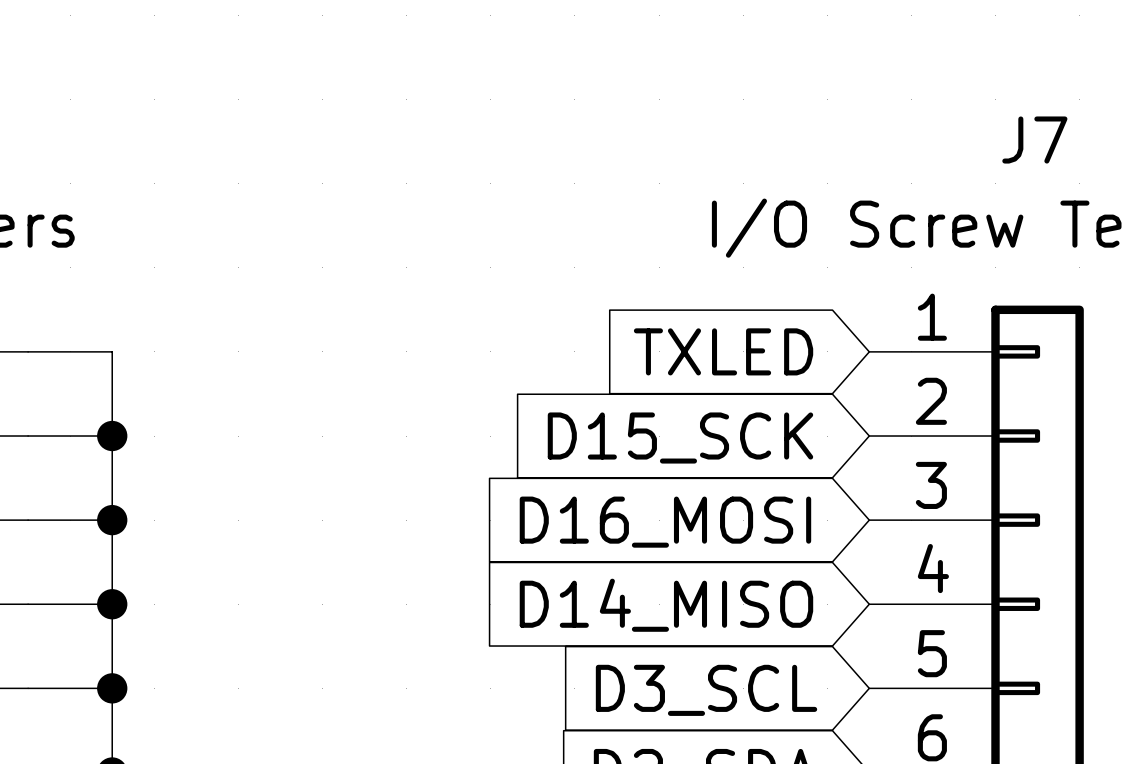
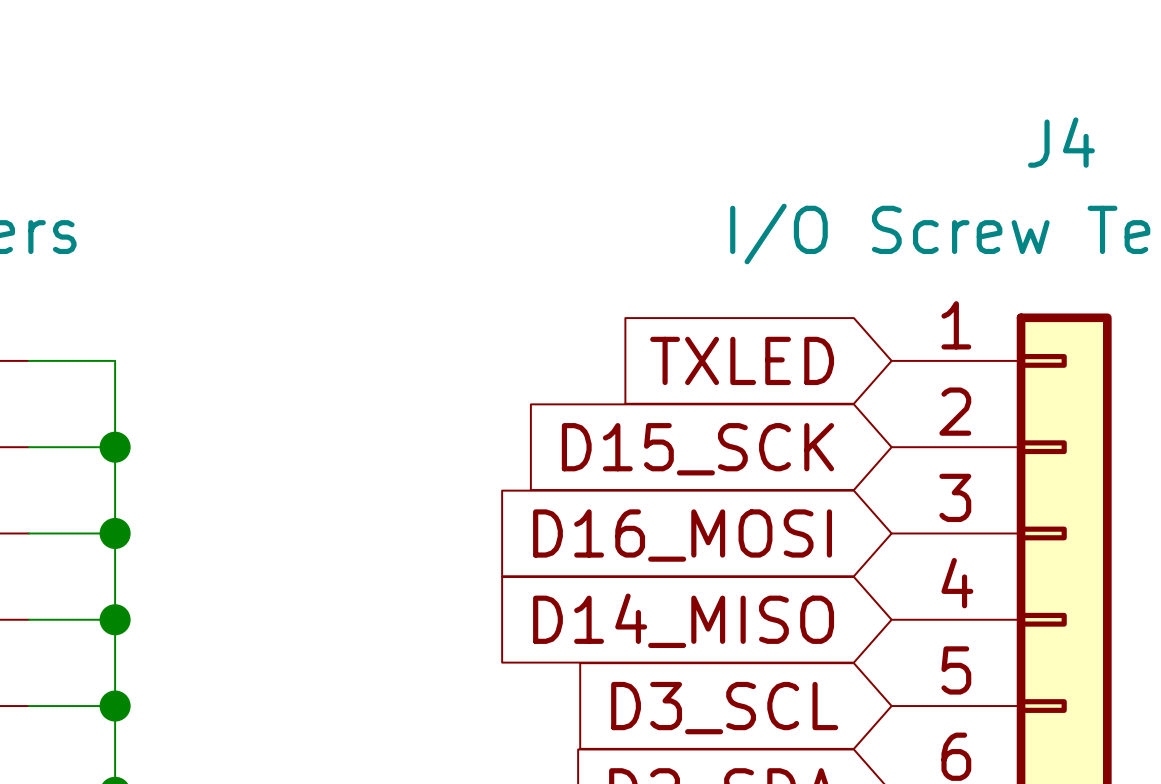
J7 name: J7 (1034, 140) -> J4 (1061, 142)

